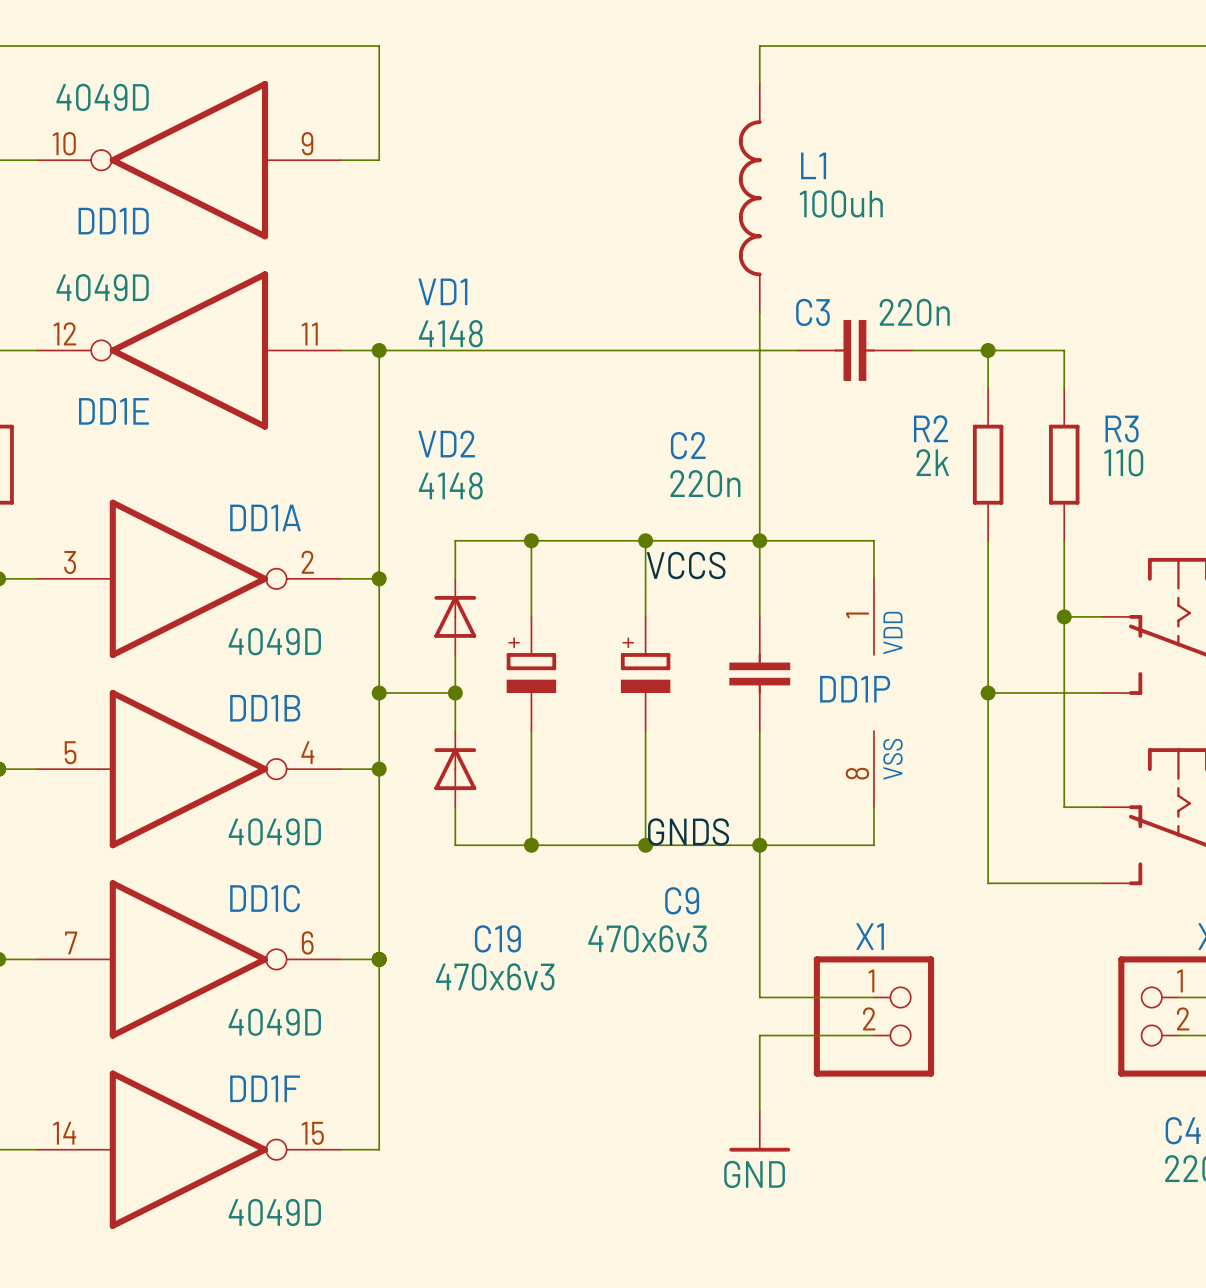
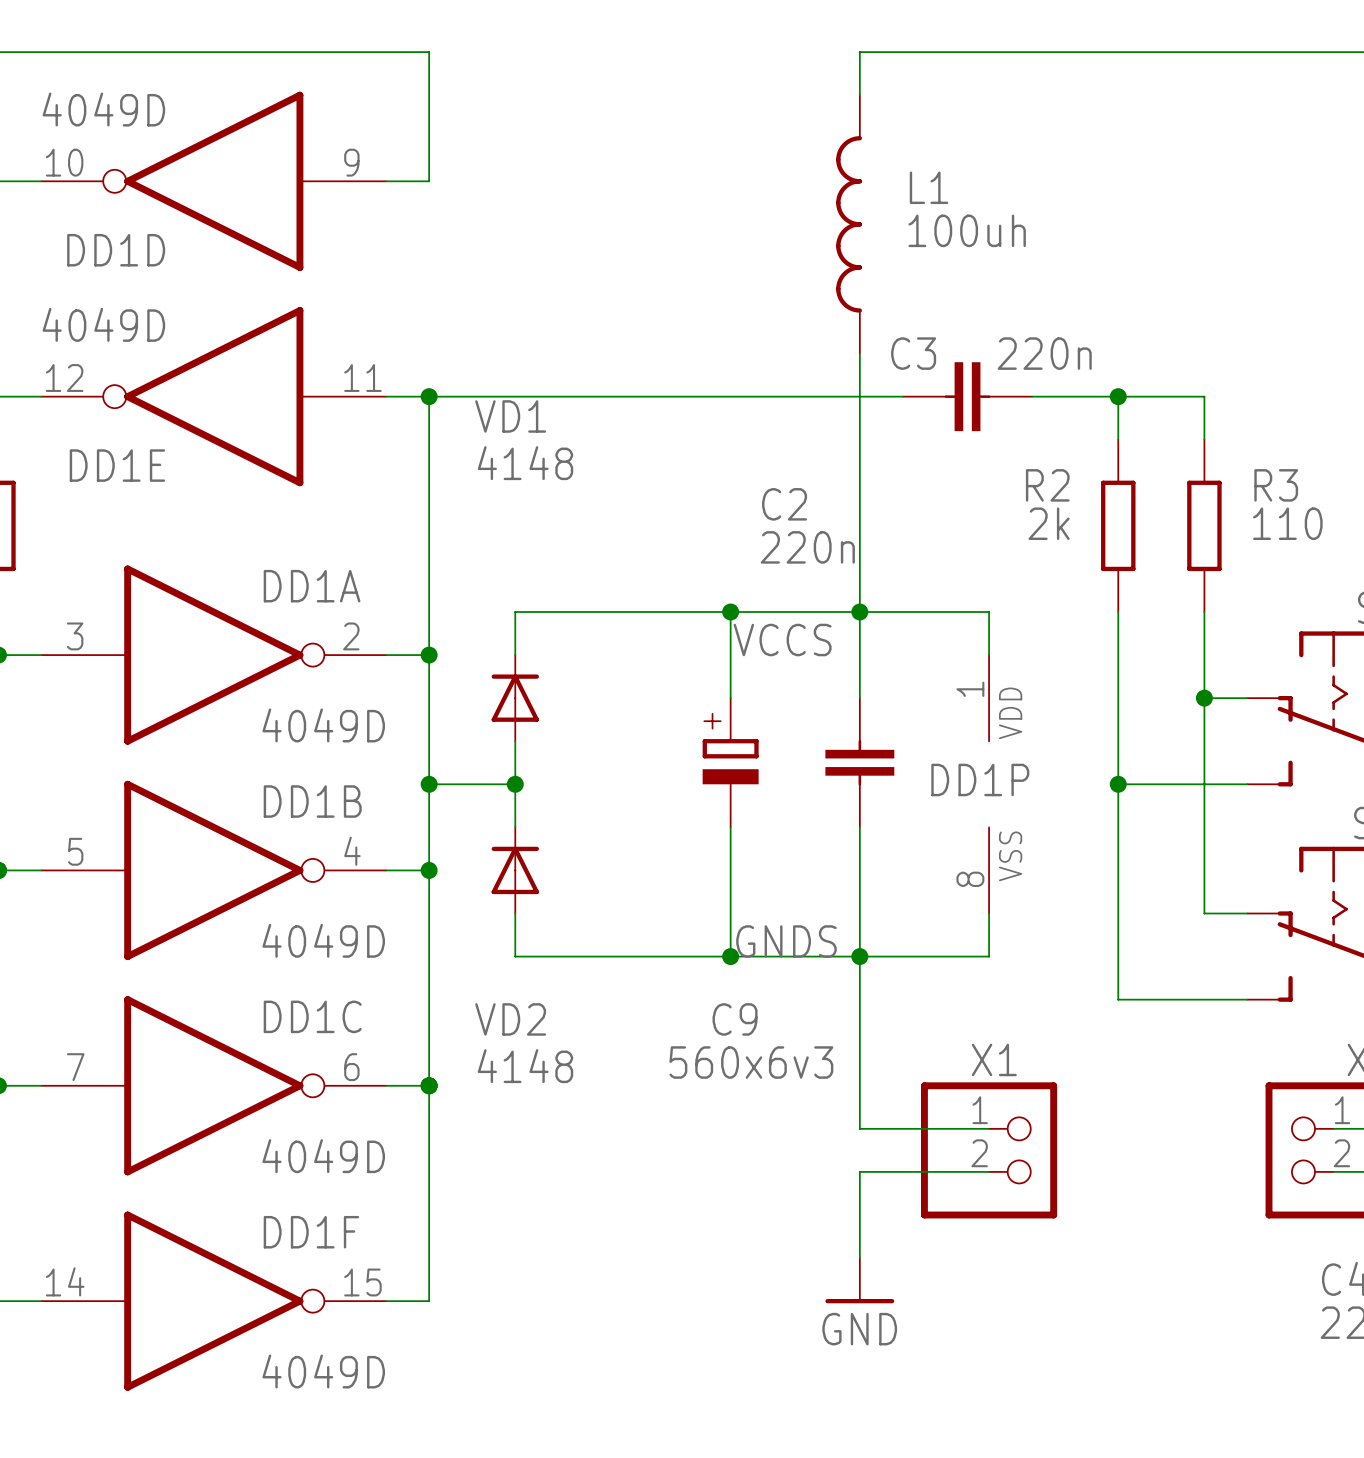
VD1 name position: VD1 (442, 291) -> VD1 (510, 416)
VD1 value position: 4148 (450, 333) -> 4148 (525, 463)
VD2 name position: VD2 (446, 443) -> VD2 (510, 1019)
VD2 value position: 4148 (450, 485) -> 4148 (525, 1066)
wire: (531, 540) (531, 616) -> none
junction: (531, 540) -> none
C19: 470x6v3 (531, 673) -> none
wire: (531, 731) (531, 845) -> none
junction: (531, 845) -> none
C9 name position: C9 (682, 900) -> C9 (735, 1019)
C9 value: 470x6v3 (647, 938) -> 560x6v3 (751, 1062)

